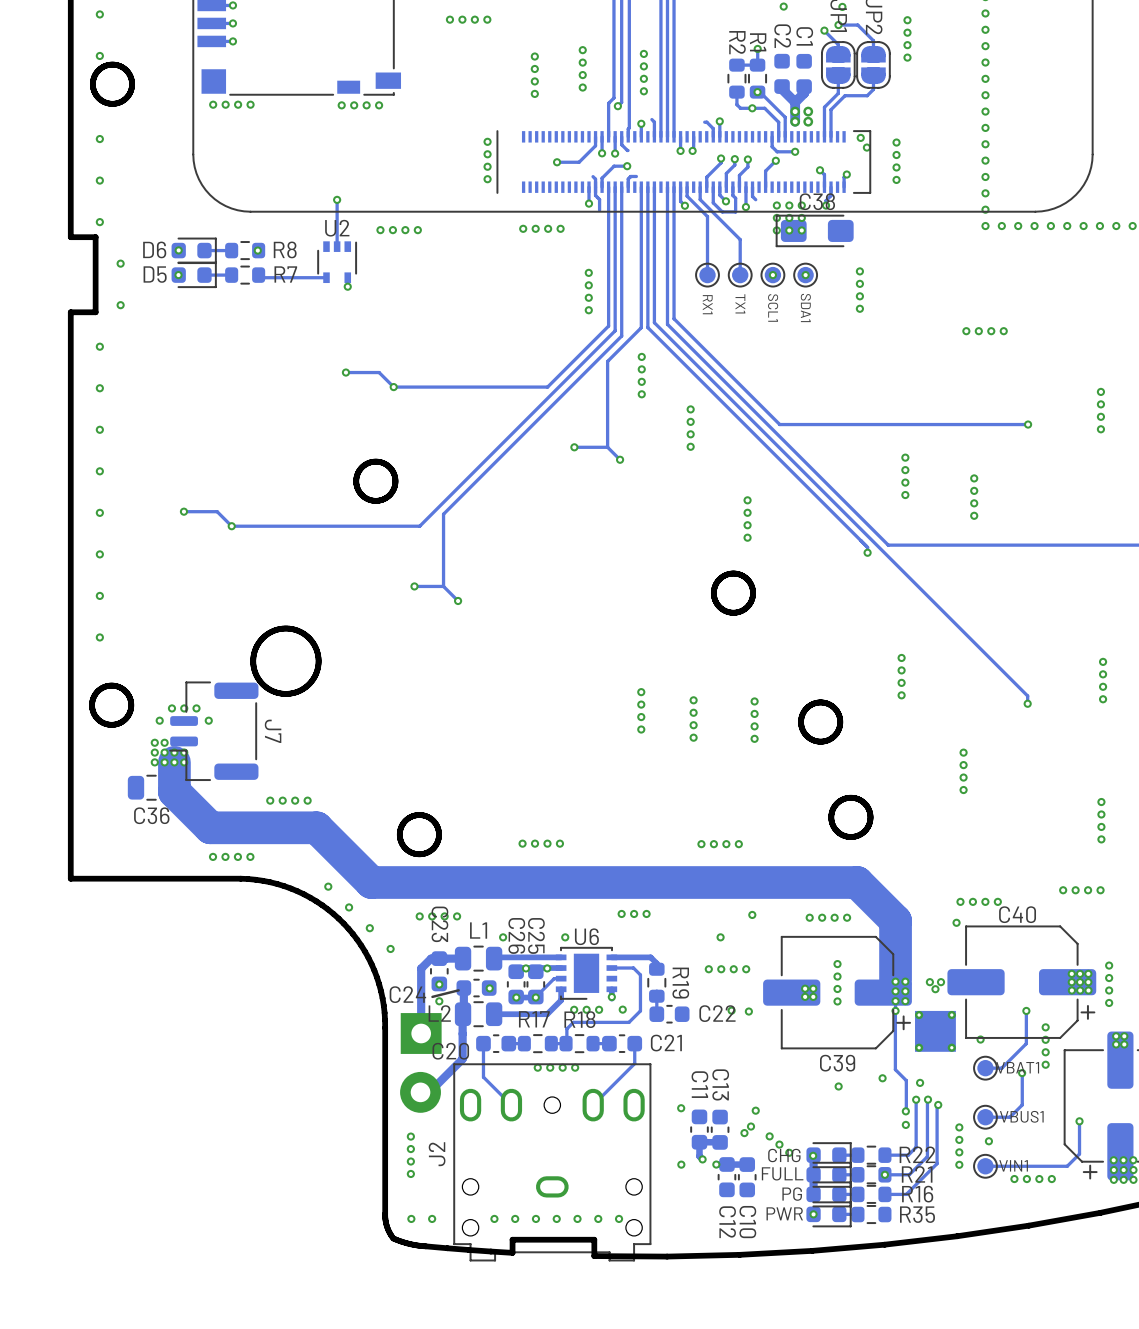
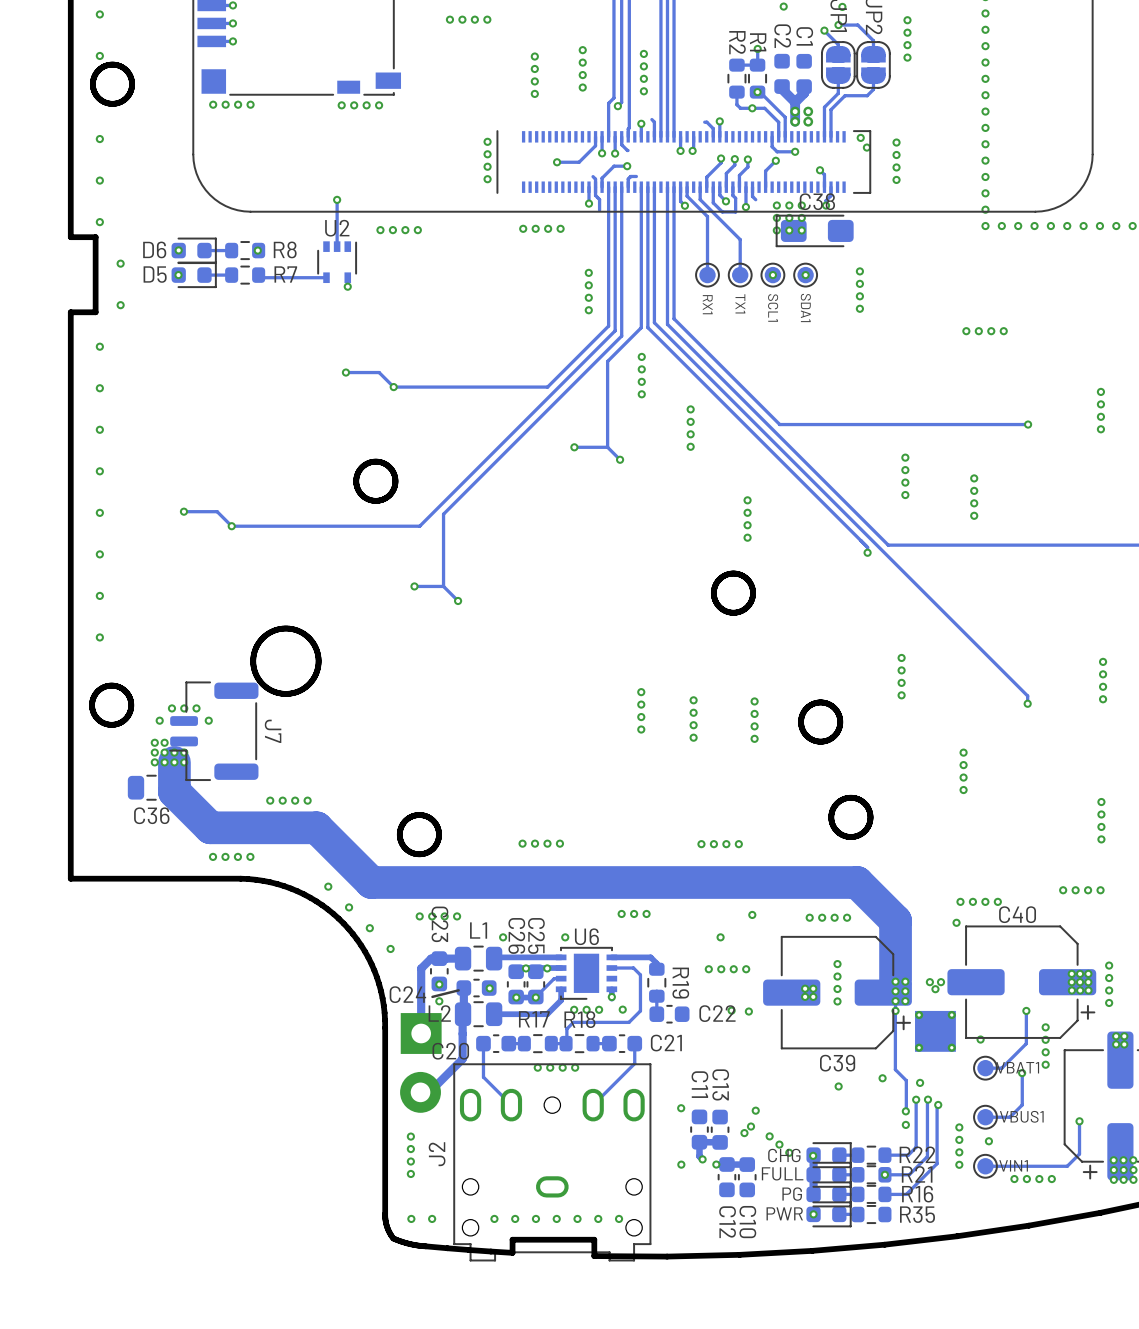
track: (846, 174) (844, 177) (844, 187) -> none
via: (846, 174) -> none

